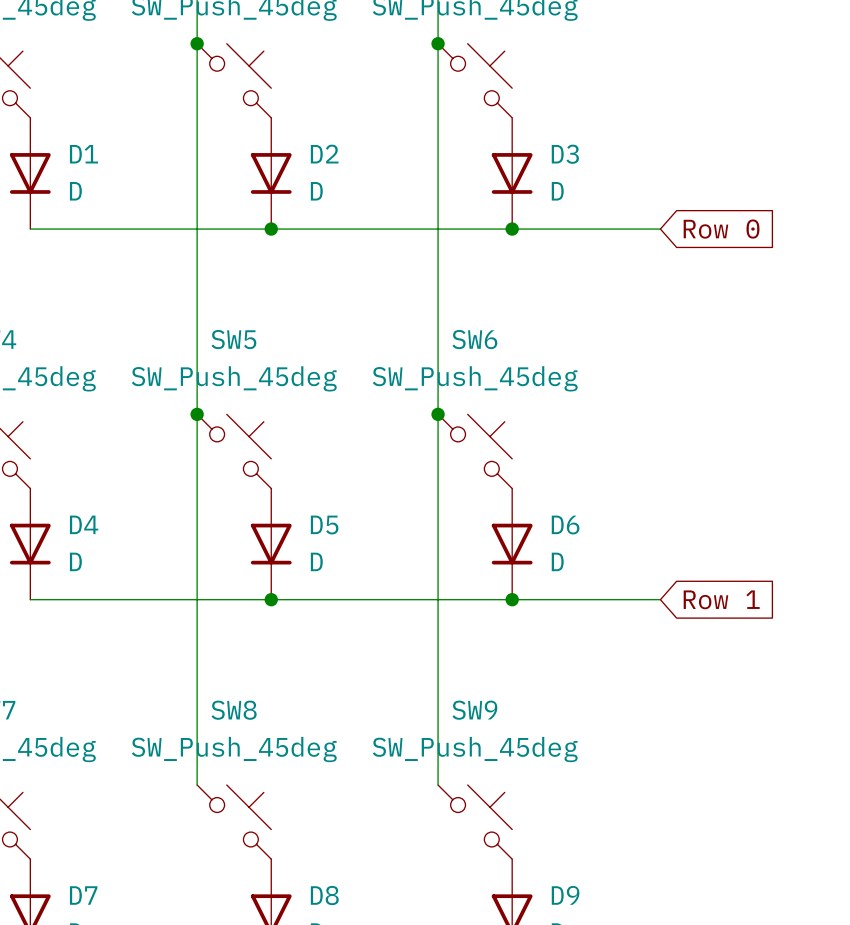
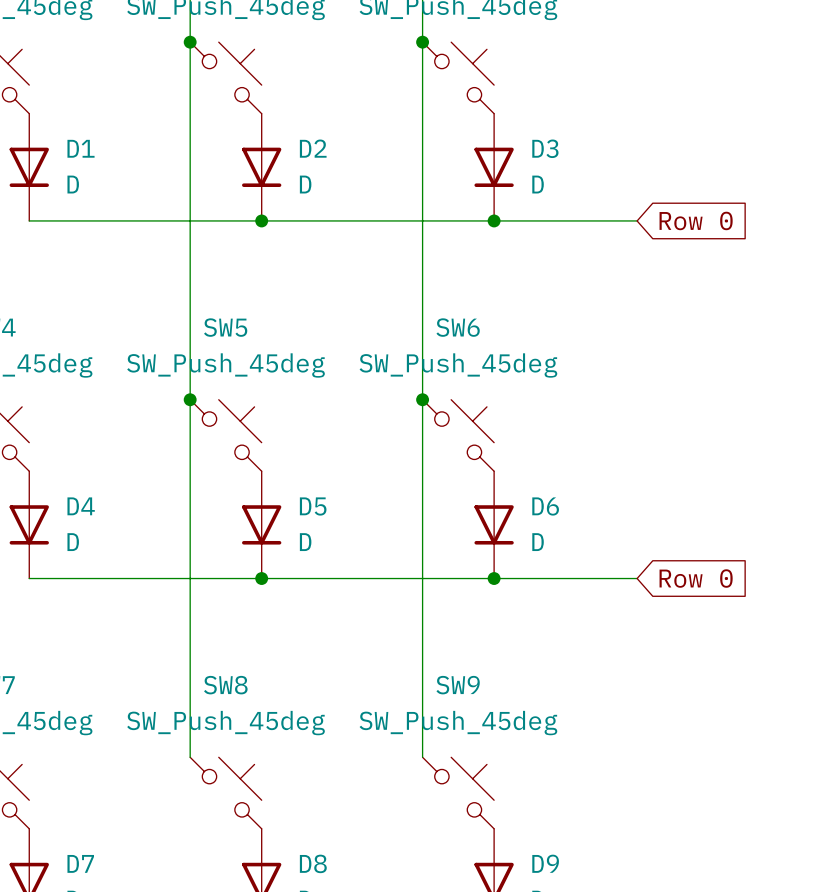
global label: Row 1 (721, 599) -> Row 0 (696, 578)

